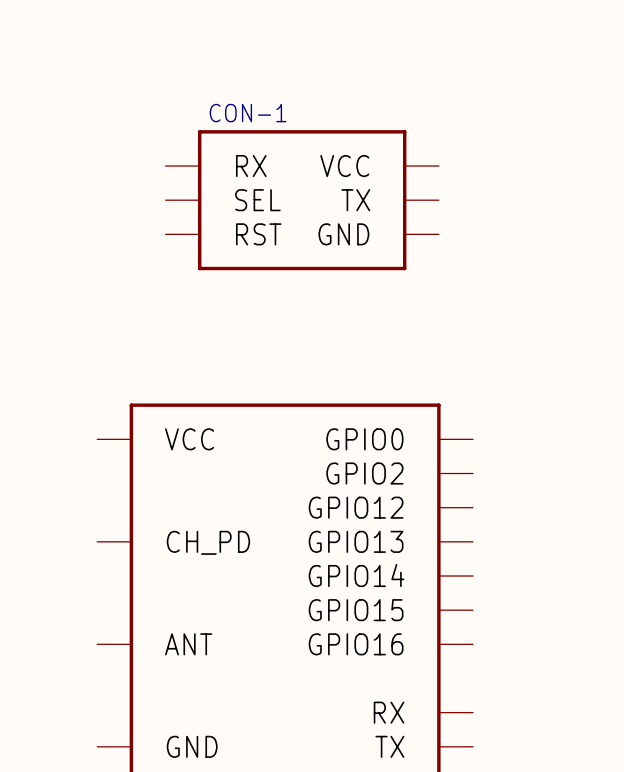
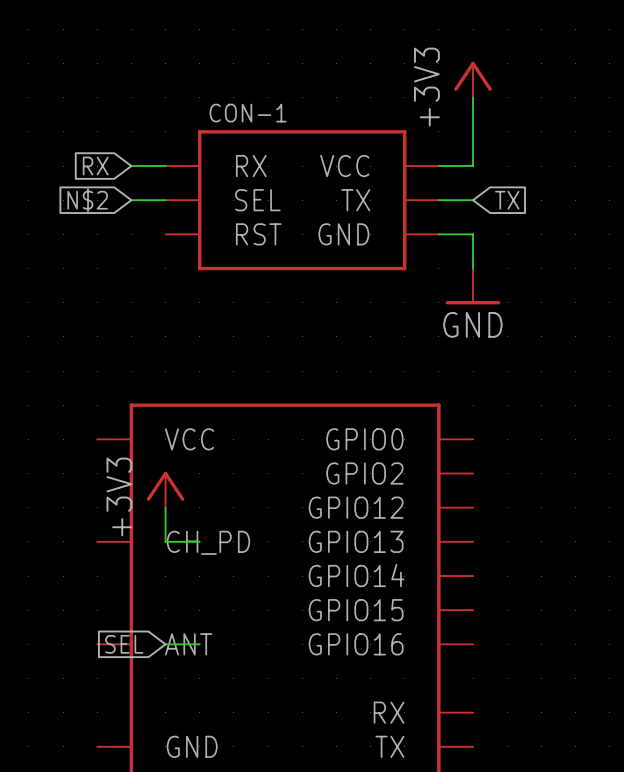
power symbol: none -> +3V3 (473, 79)
wire: none -> (473, 97) (473, 166) (438, 166)
global label: none -> RX (95, 166)
wire: none -> (131, 166) (165, 166)
global label: none -> N$2 (87, 200)
wire: none -> (131, 200) (165, 200)
wire: none -> (438, 200) (473, 200)
global label: none -> TX (507, 200)
wire: none -> (438, 234) (473, 234) (473, 268)
power symbol: none -> GND (473, 286)
power symbol: none -> +3V3 (165, 489)
wire: none -> (165, 507) (165, 541) (199, 541)
global label: none -> SEL (124, 644)
wire: none -> (165, 644) (199, 644)

